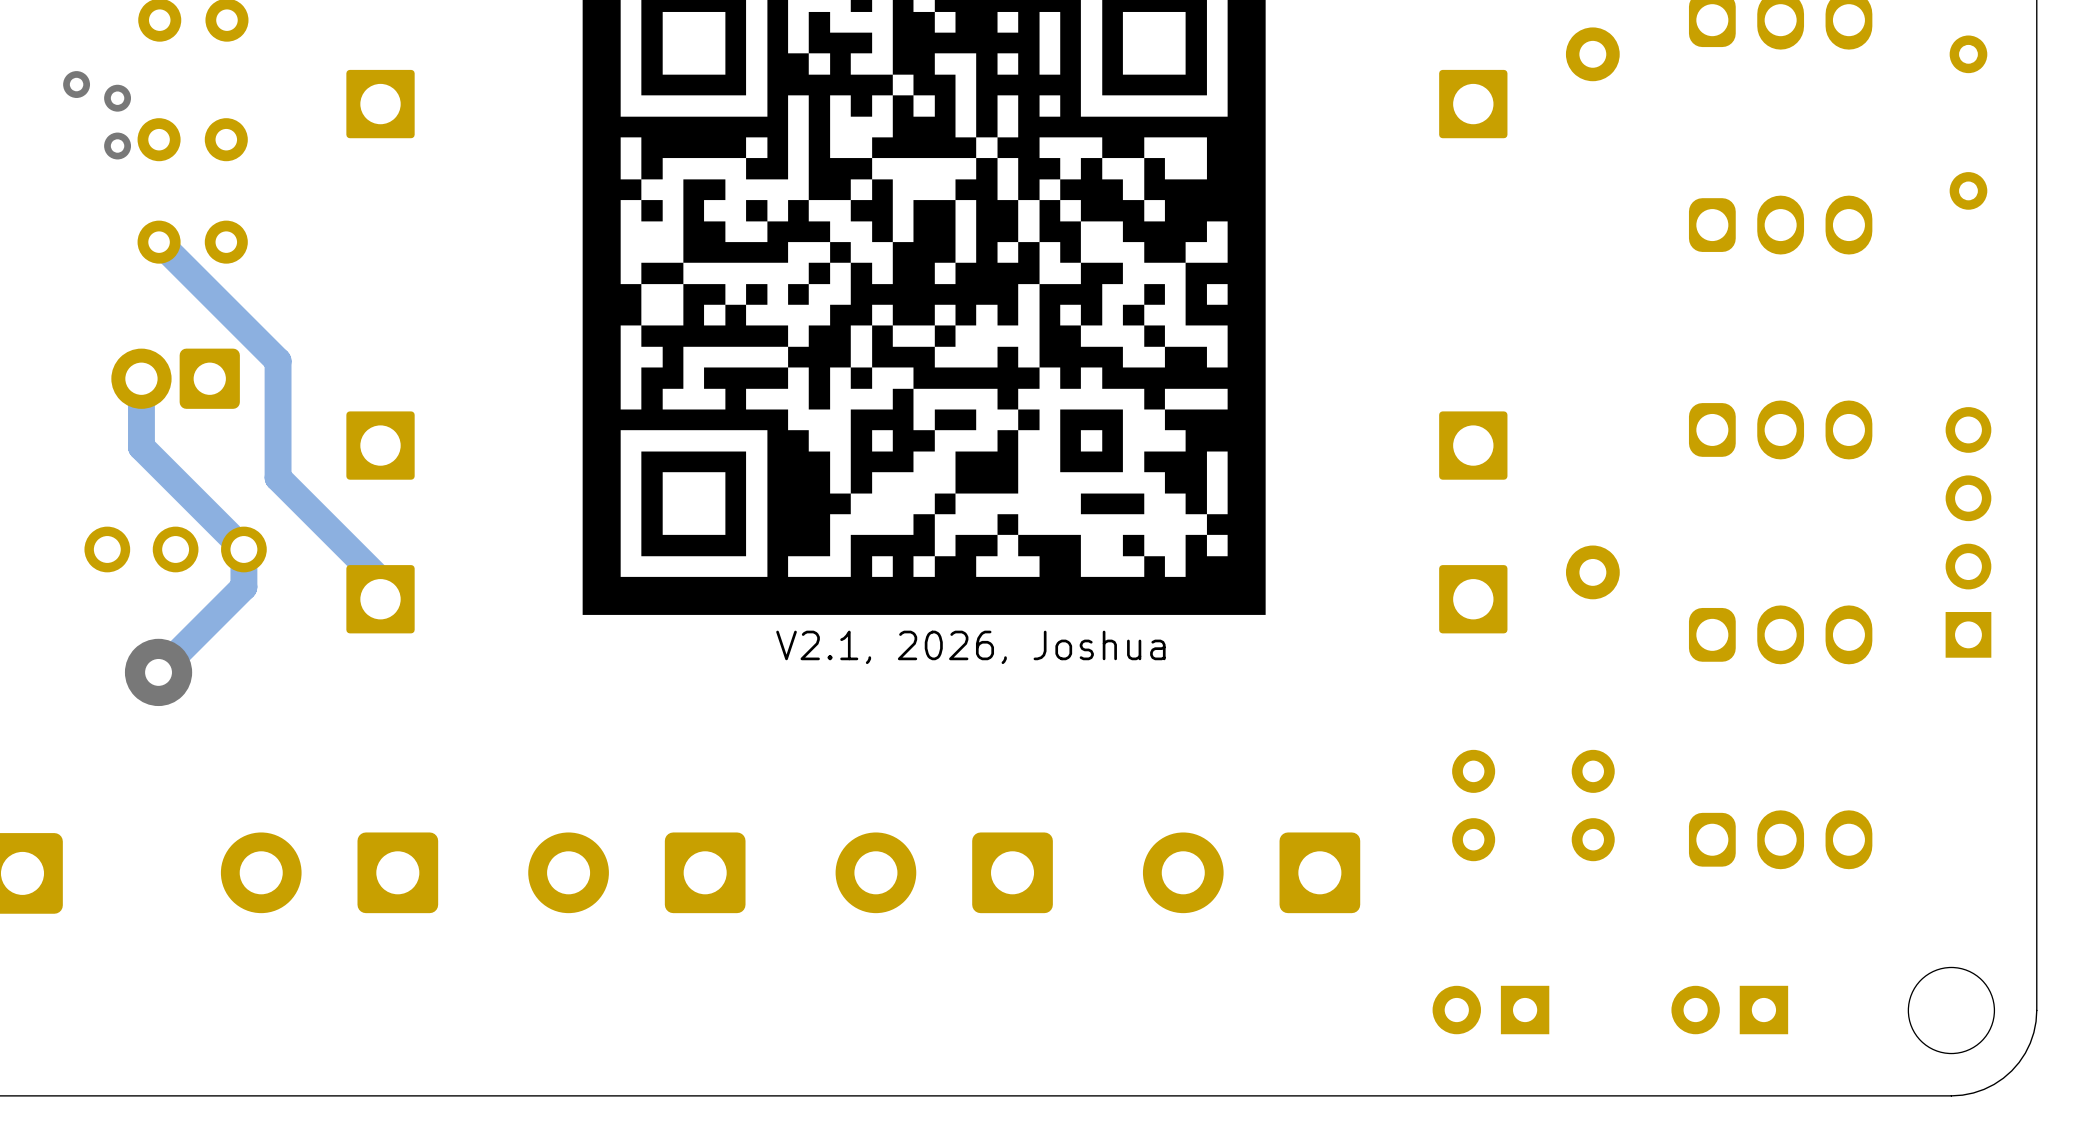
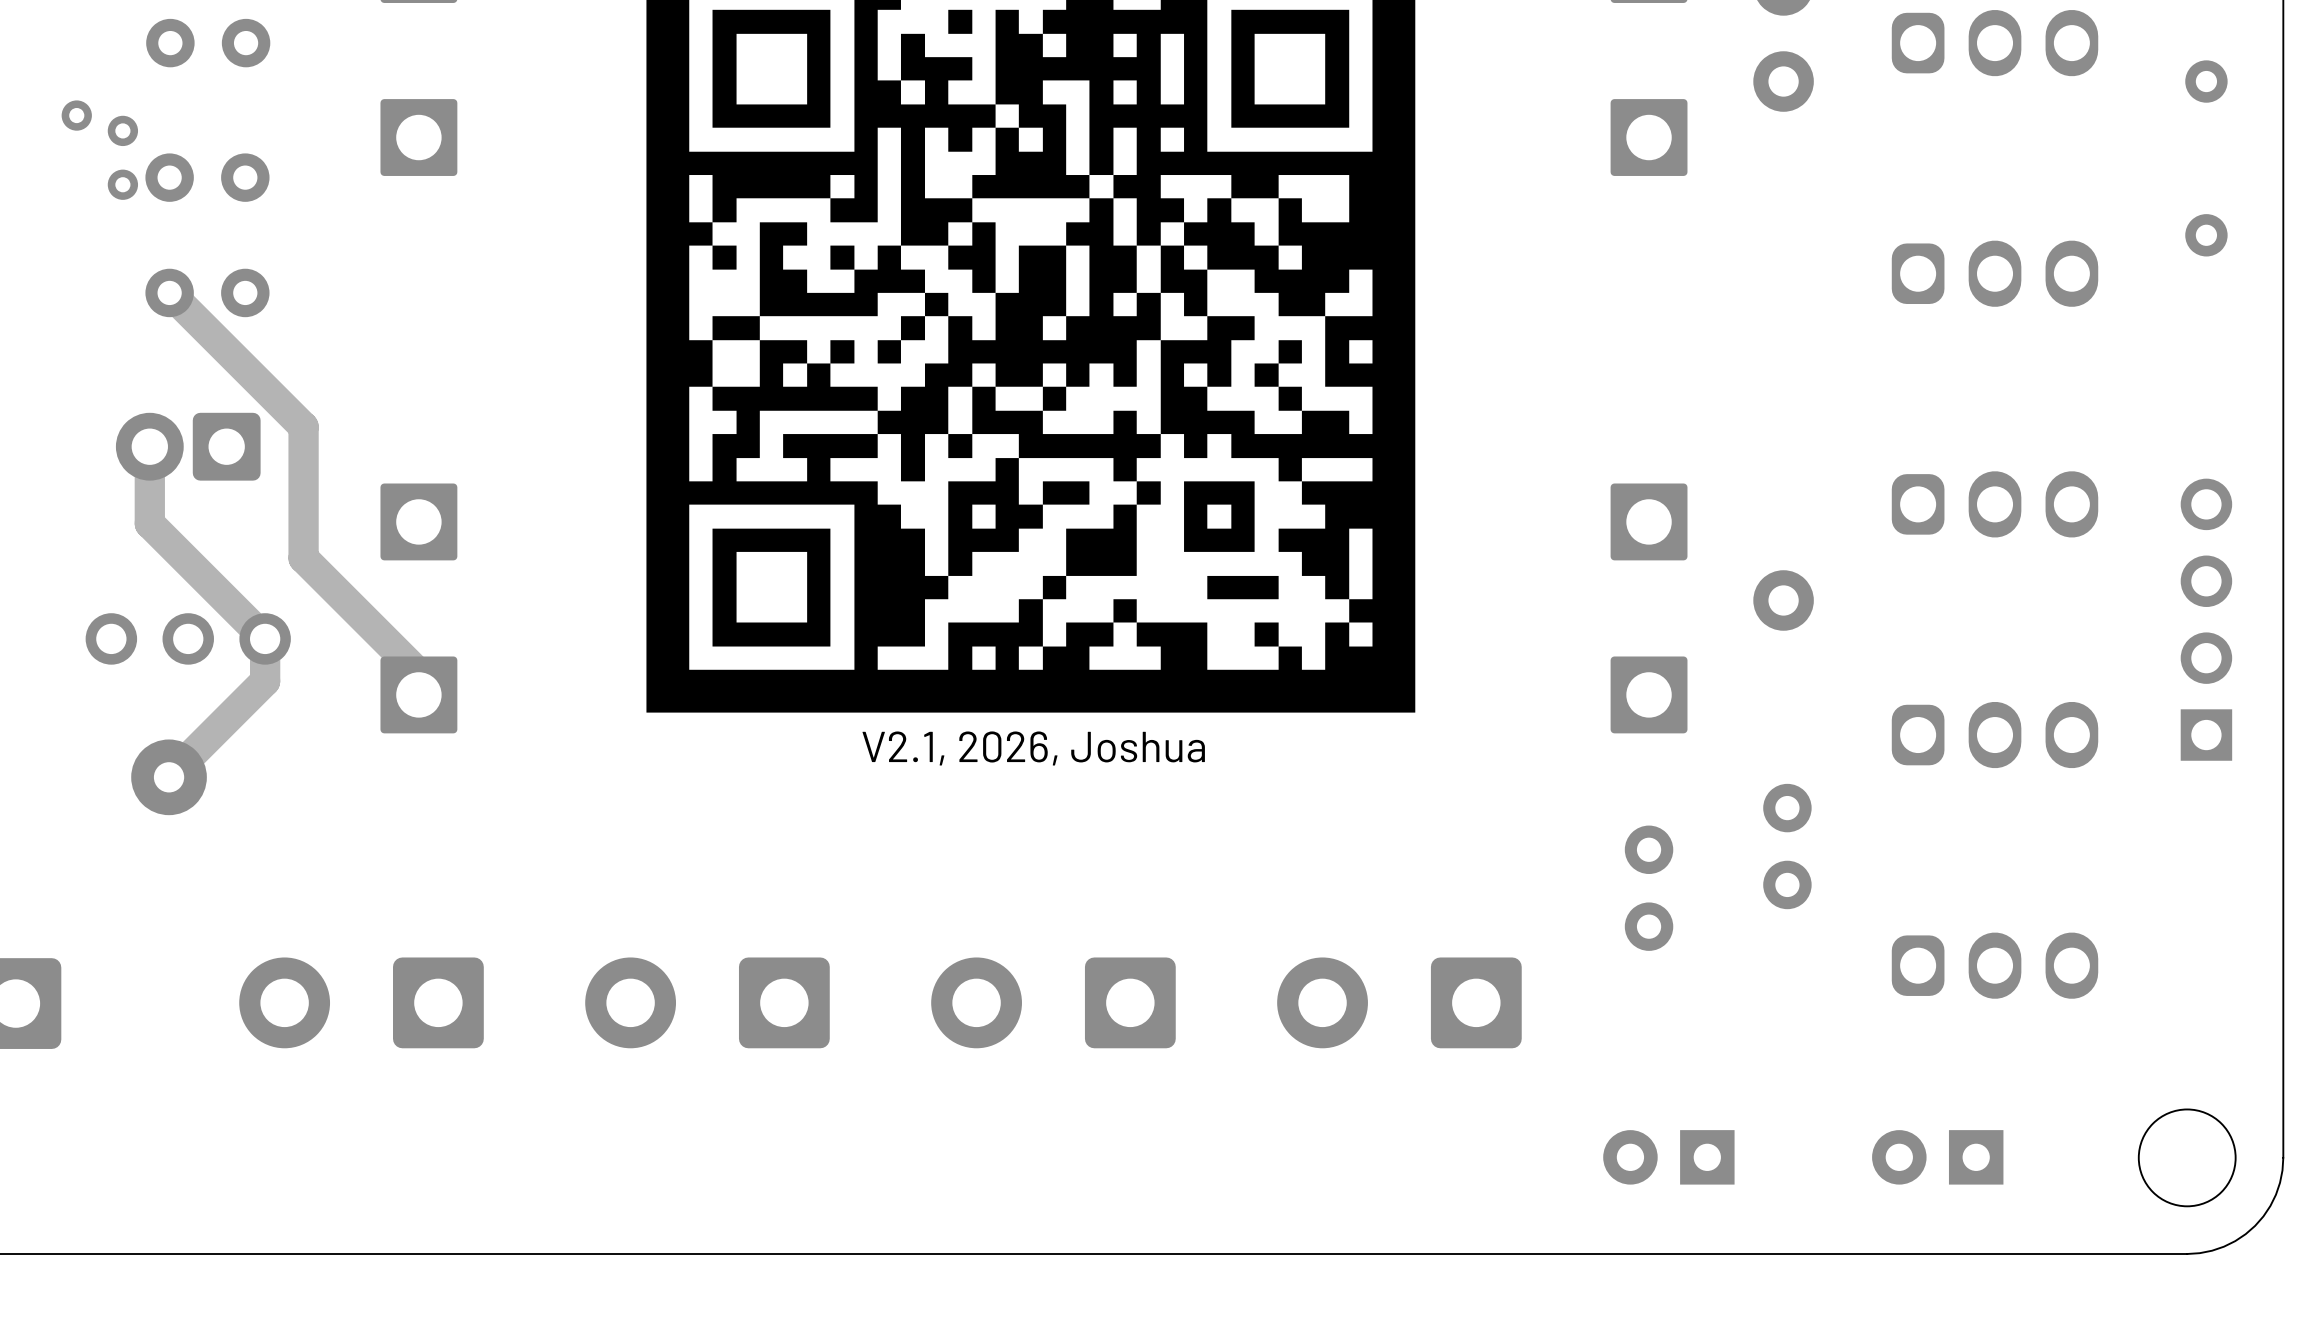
part position: (1592, 572) -> (1783, 600)
part: none -> (1787, 846)
part position: (1473, 805) -> (1649, 888)
part: (1593, 805) -> none

